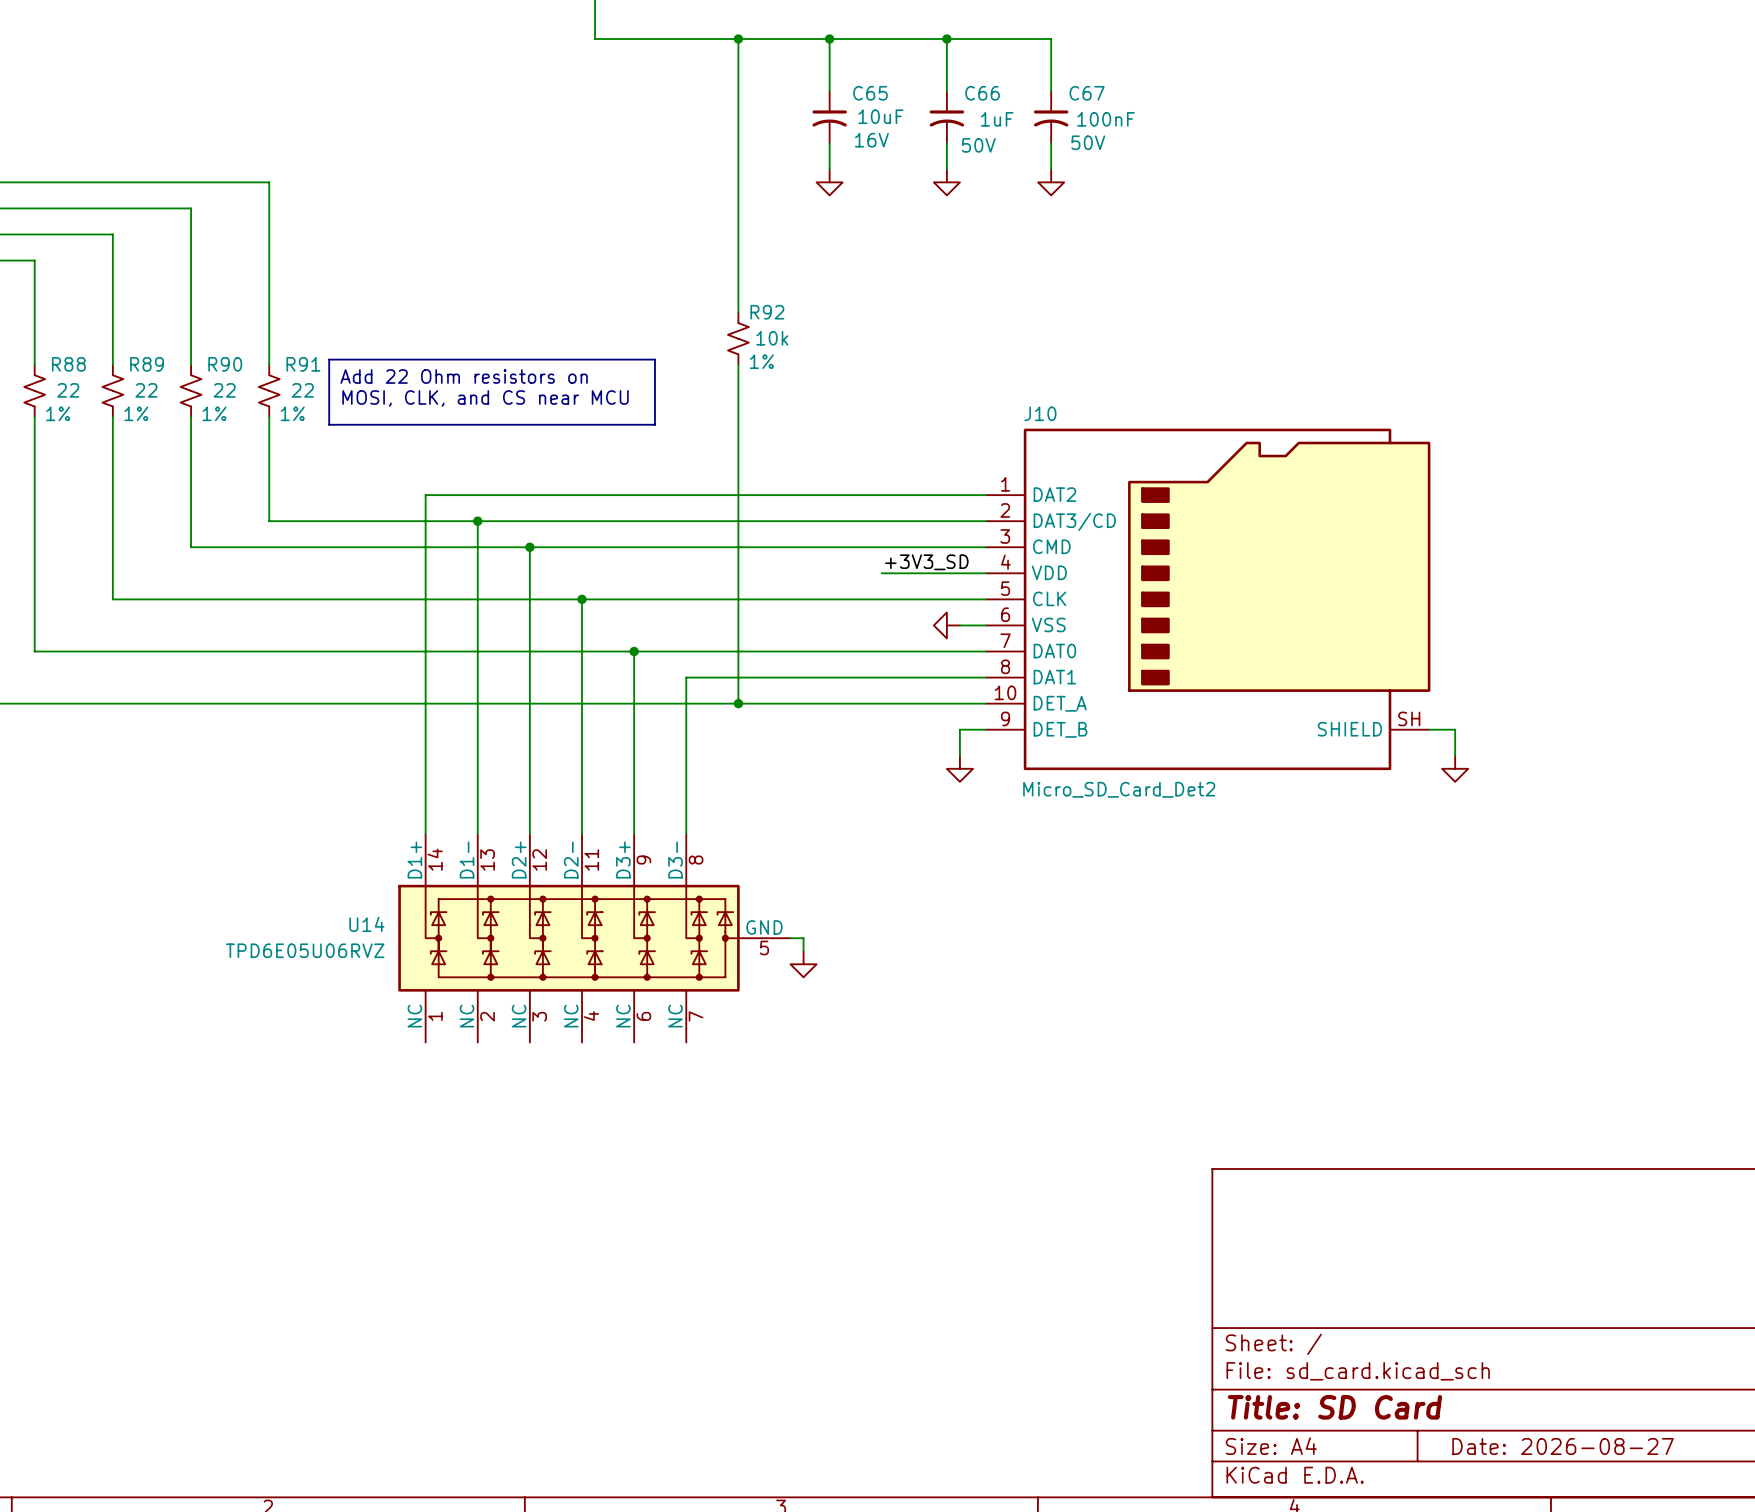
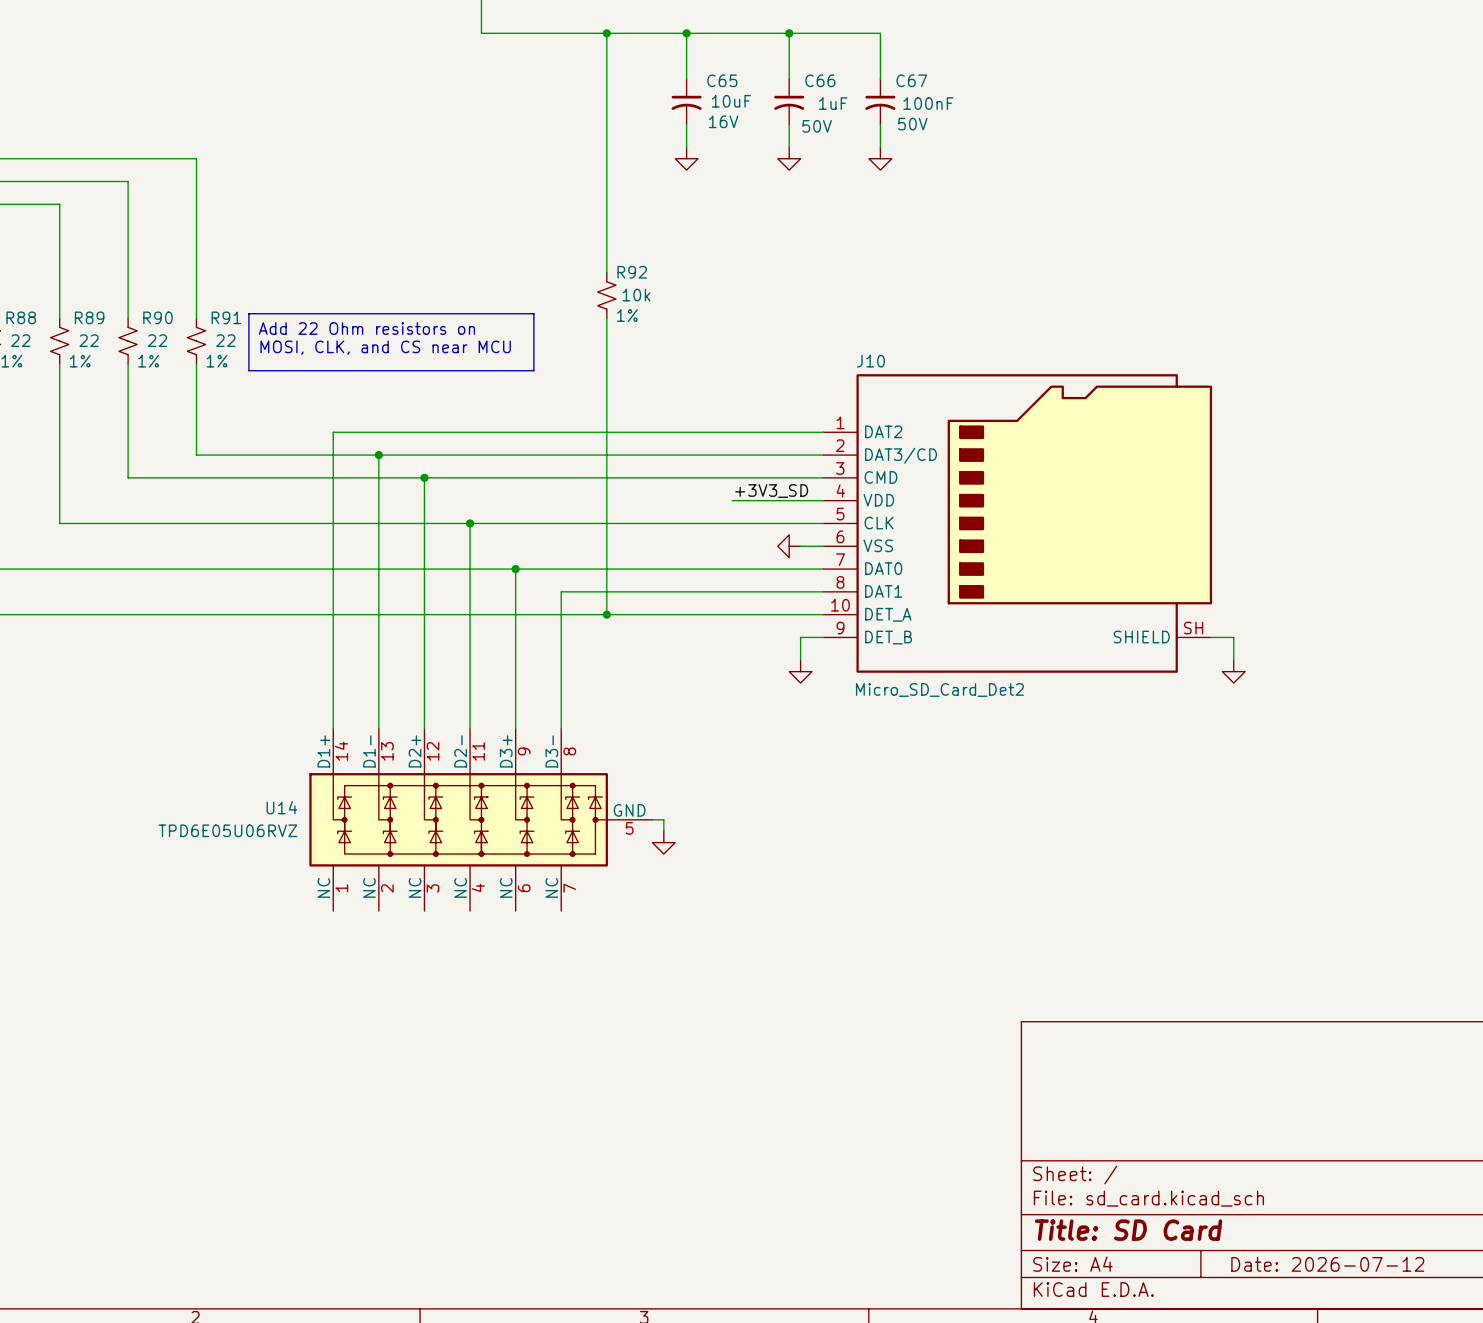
title block: Date: 2026-08-27 (1563, 1446) -> Date: 2026-07-12 (1327, 1264)

